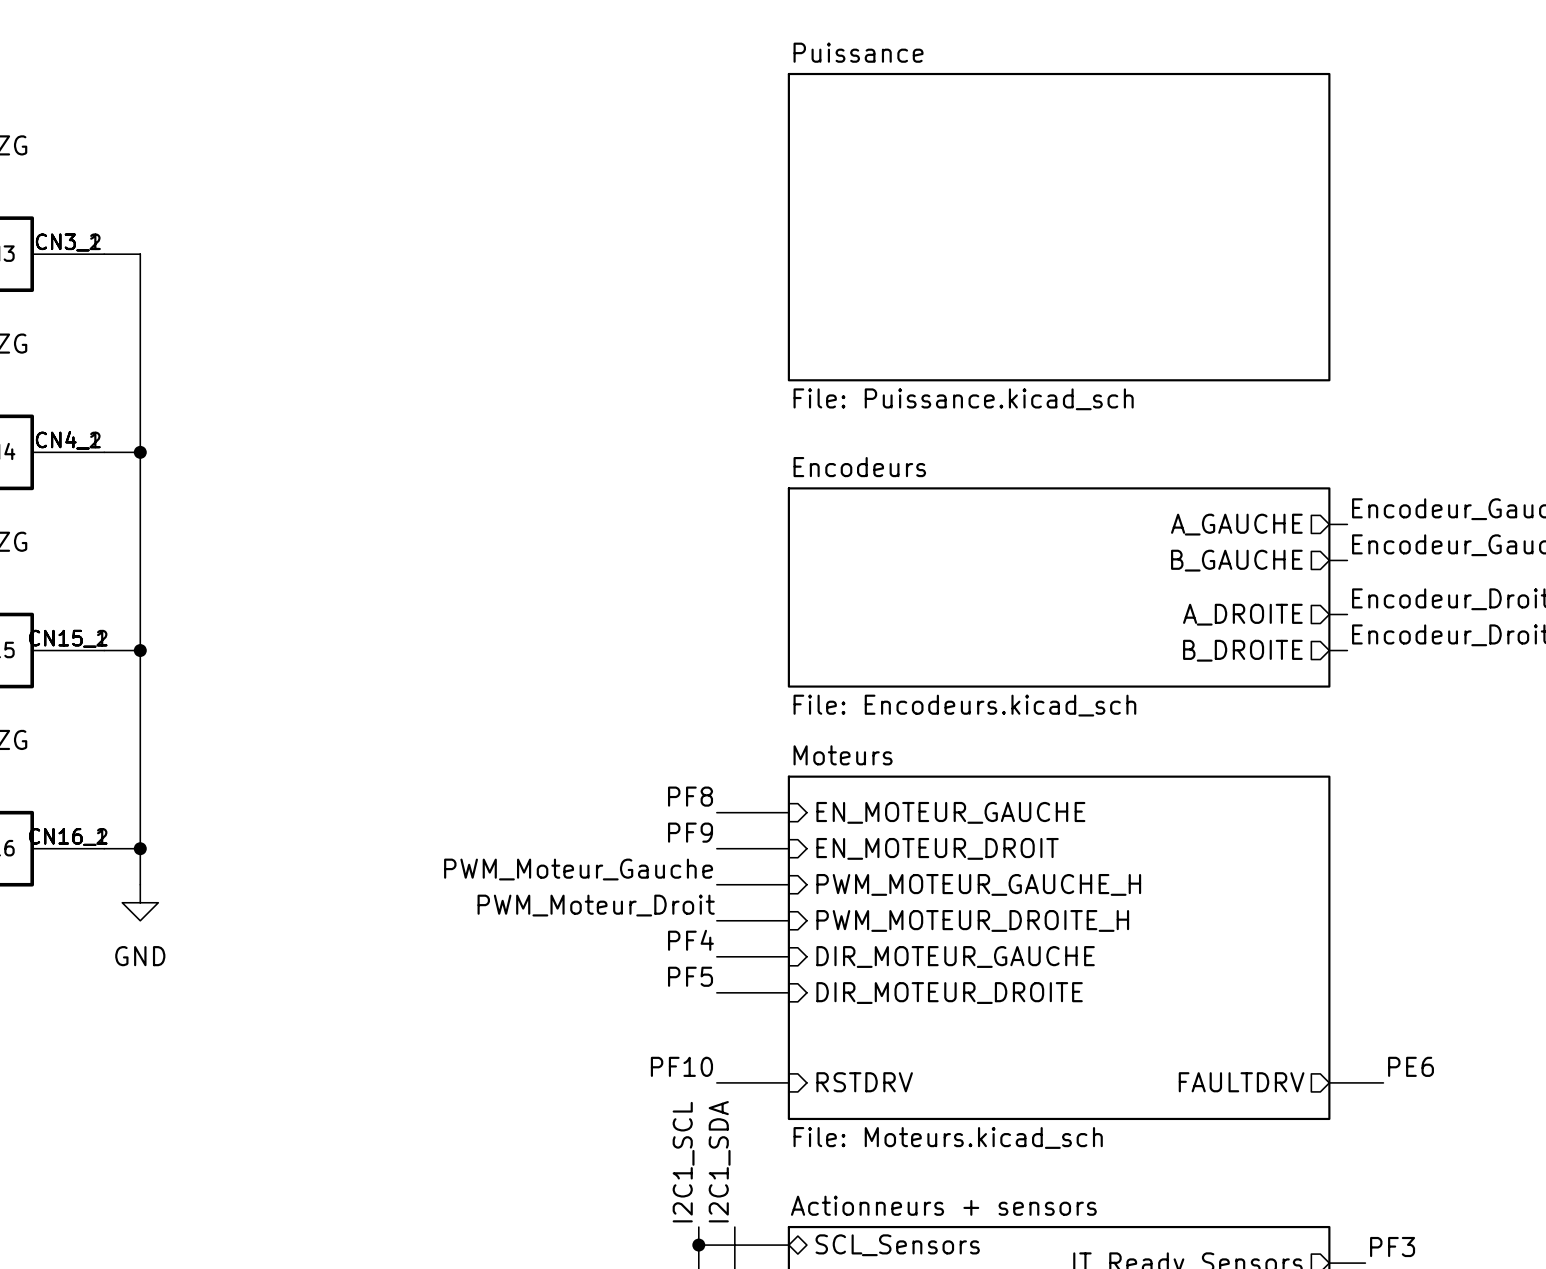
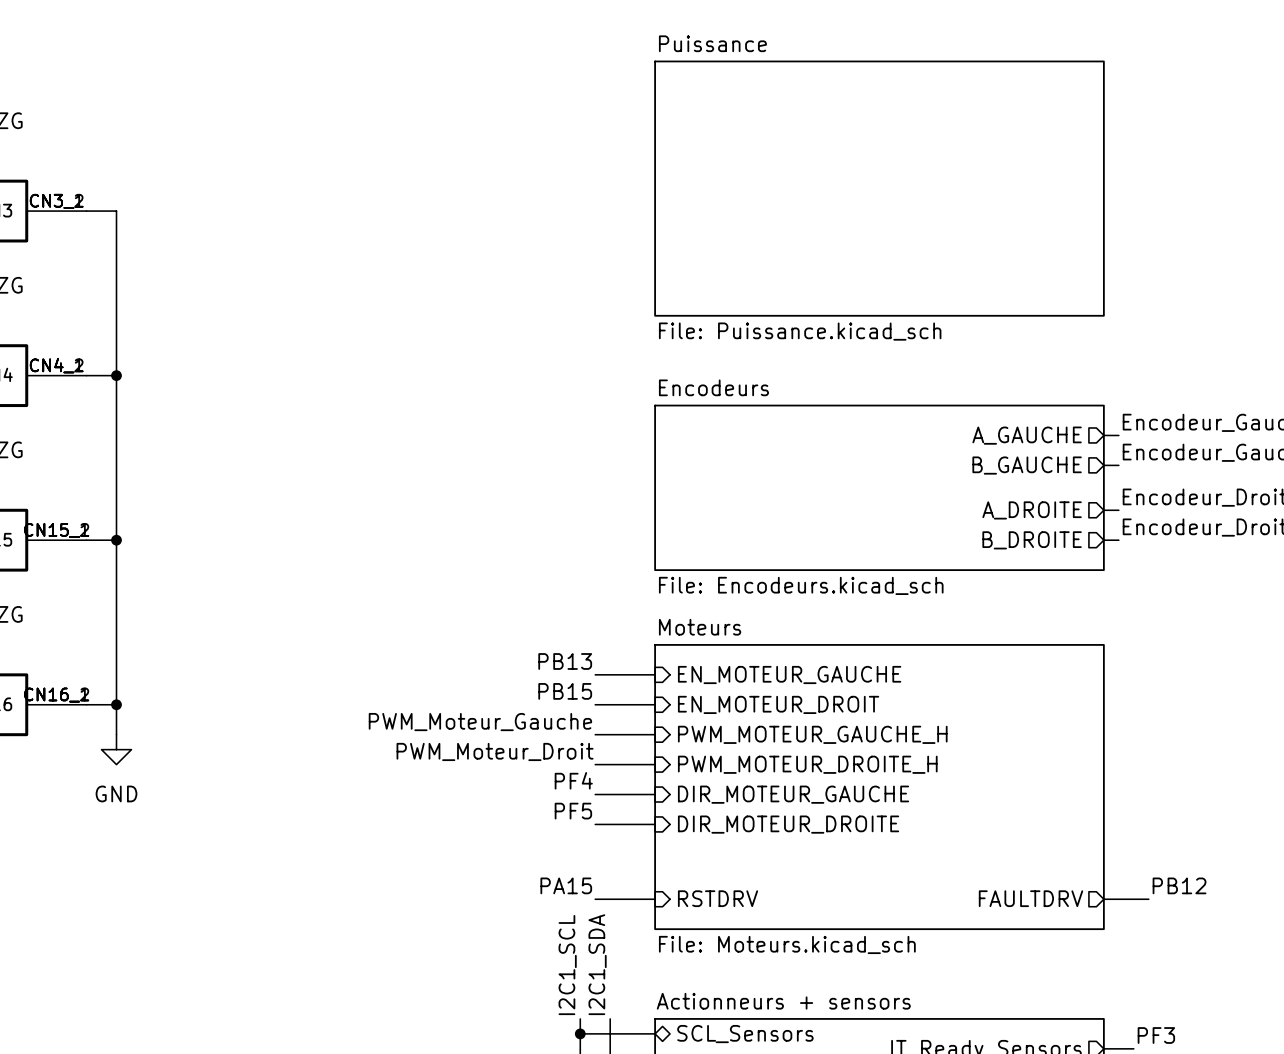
label: PF8 (690, 796) -> PB13 (565, 661)
label: PF9 (690, 832) -> PB15 (565, 691)
label: PF10 (681, 1066) -> PA15 (566, 885)
label: PE6 (1411, 1066) -> PB12 (1179, 885)

